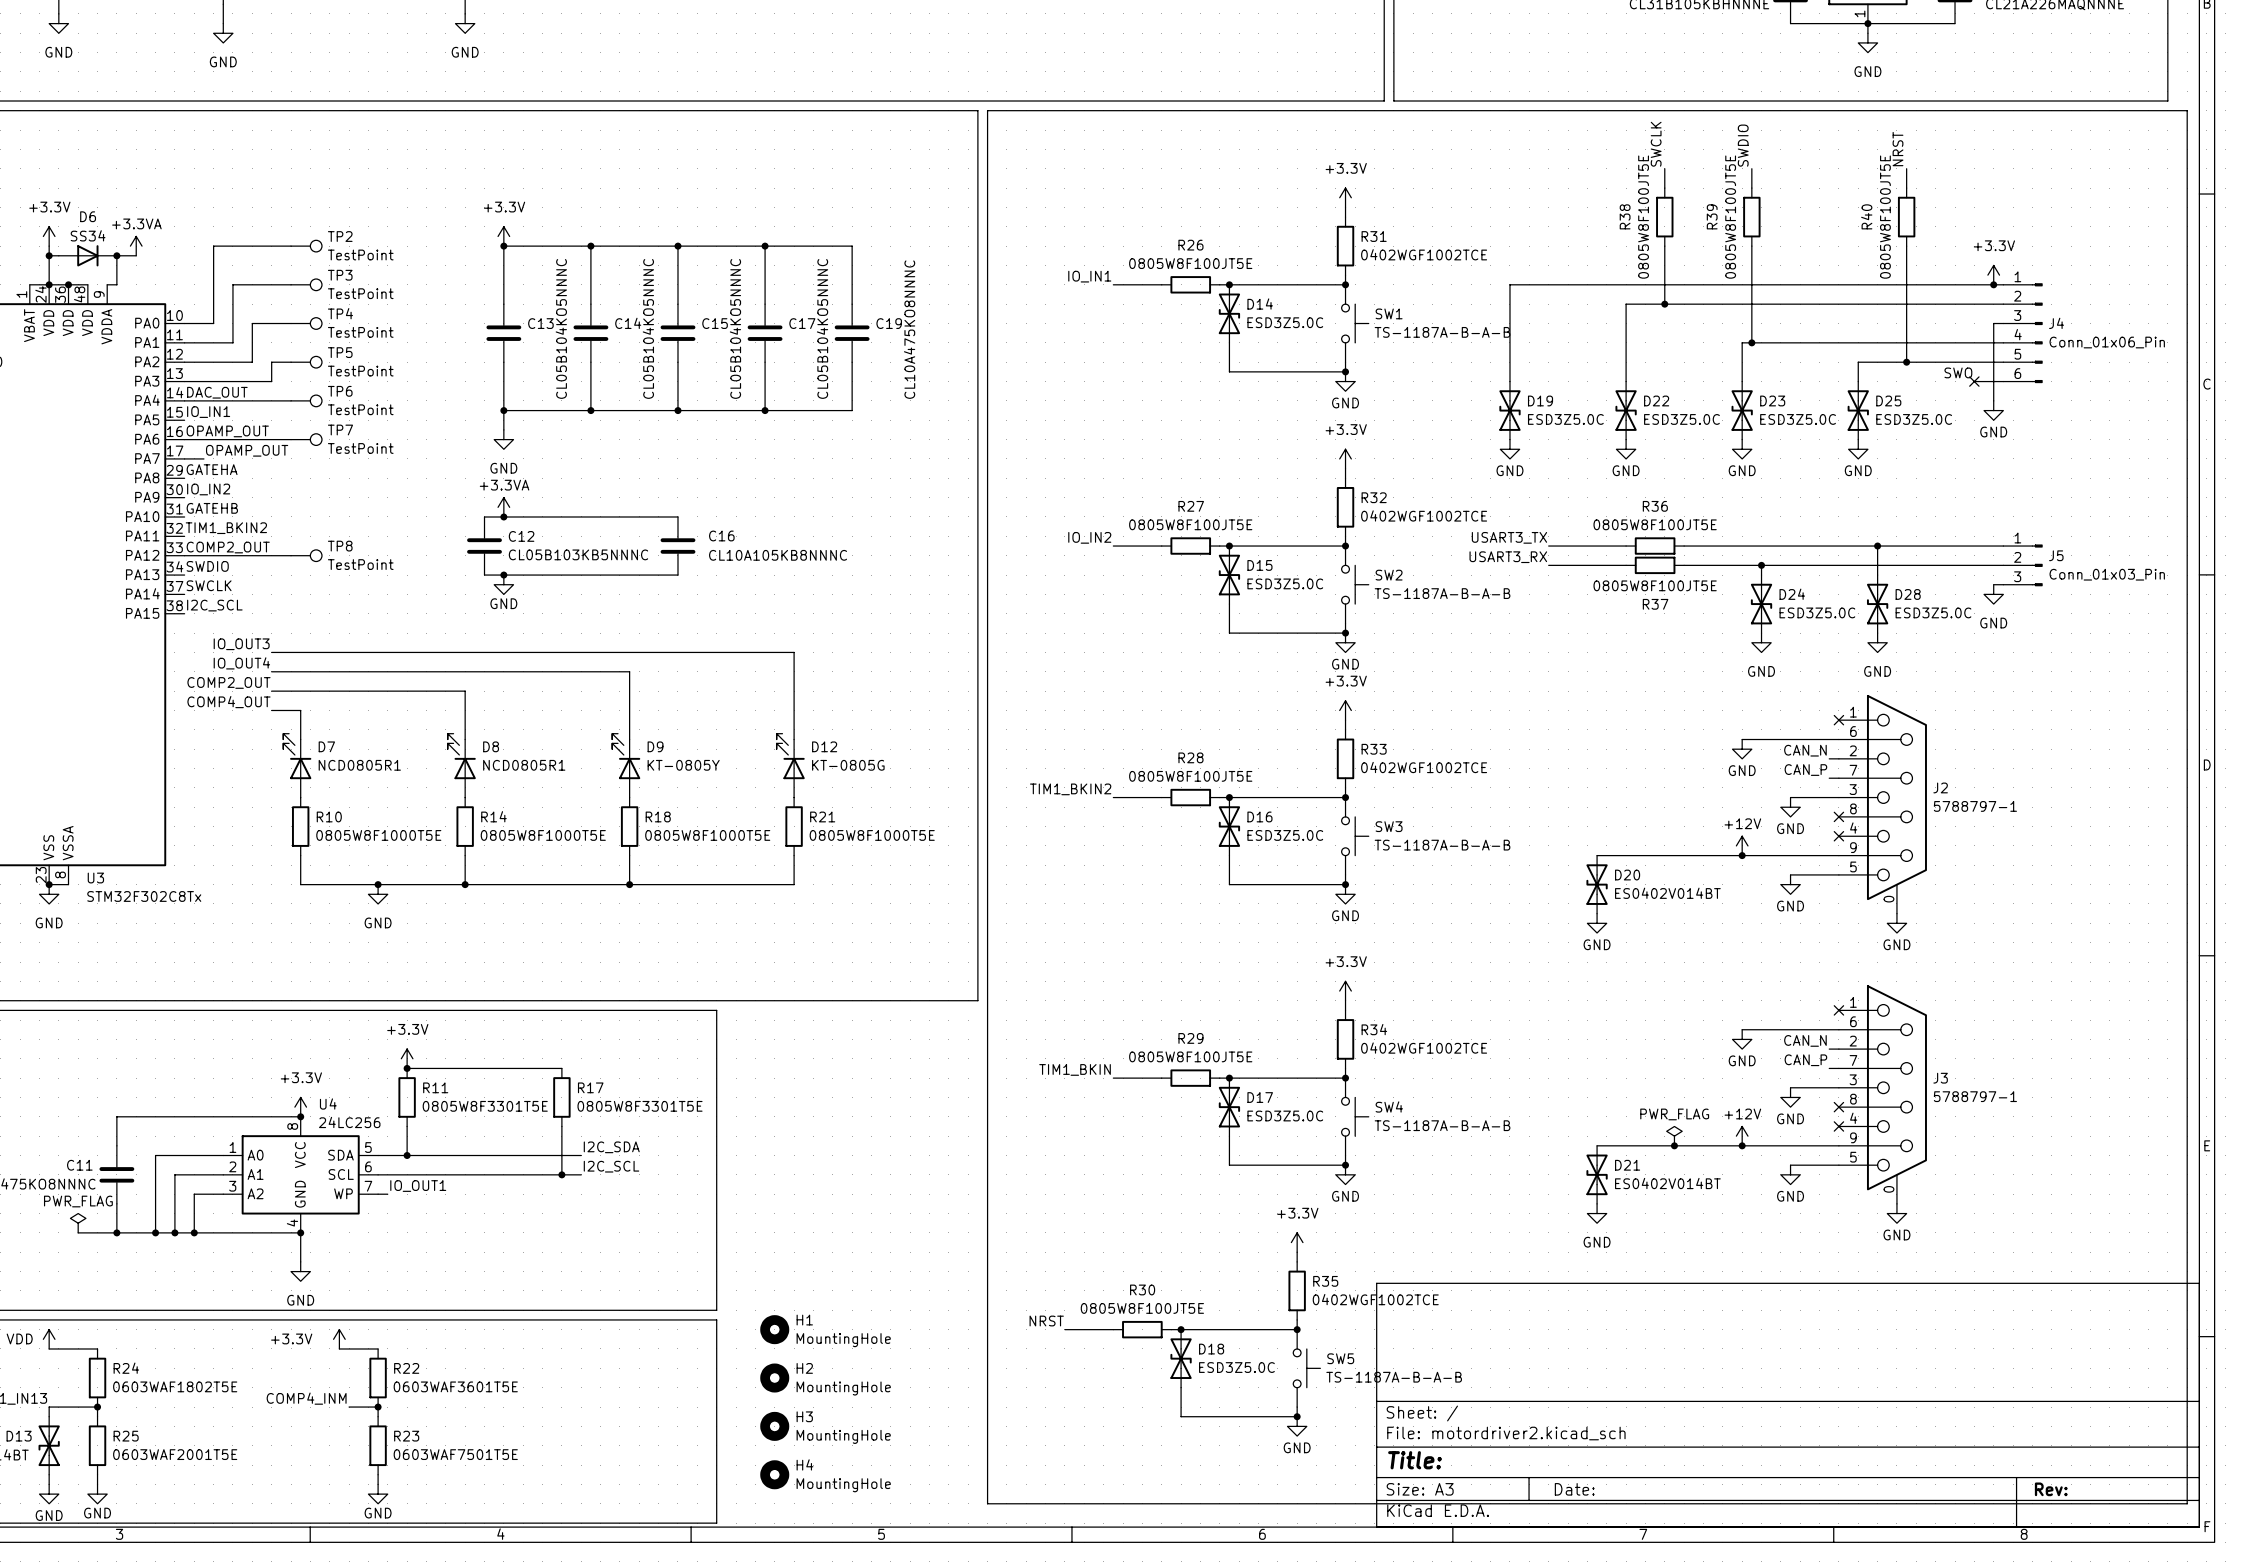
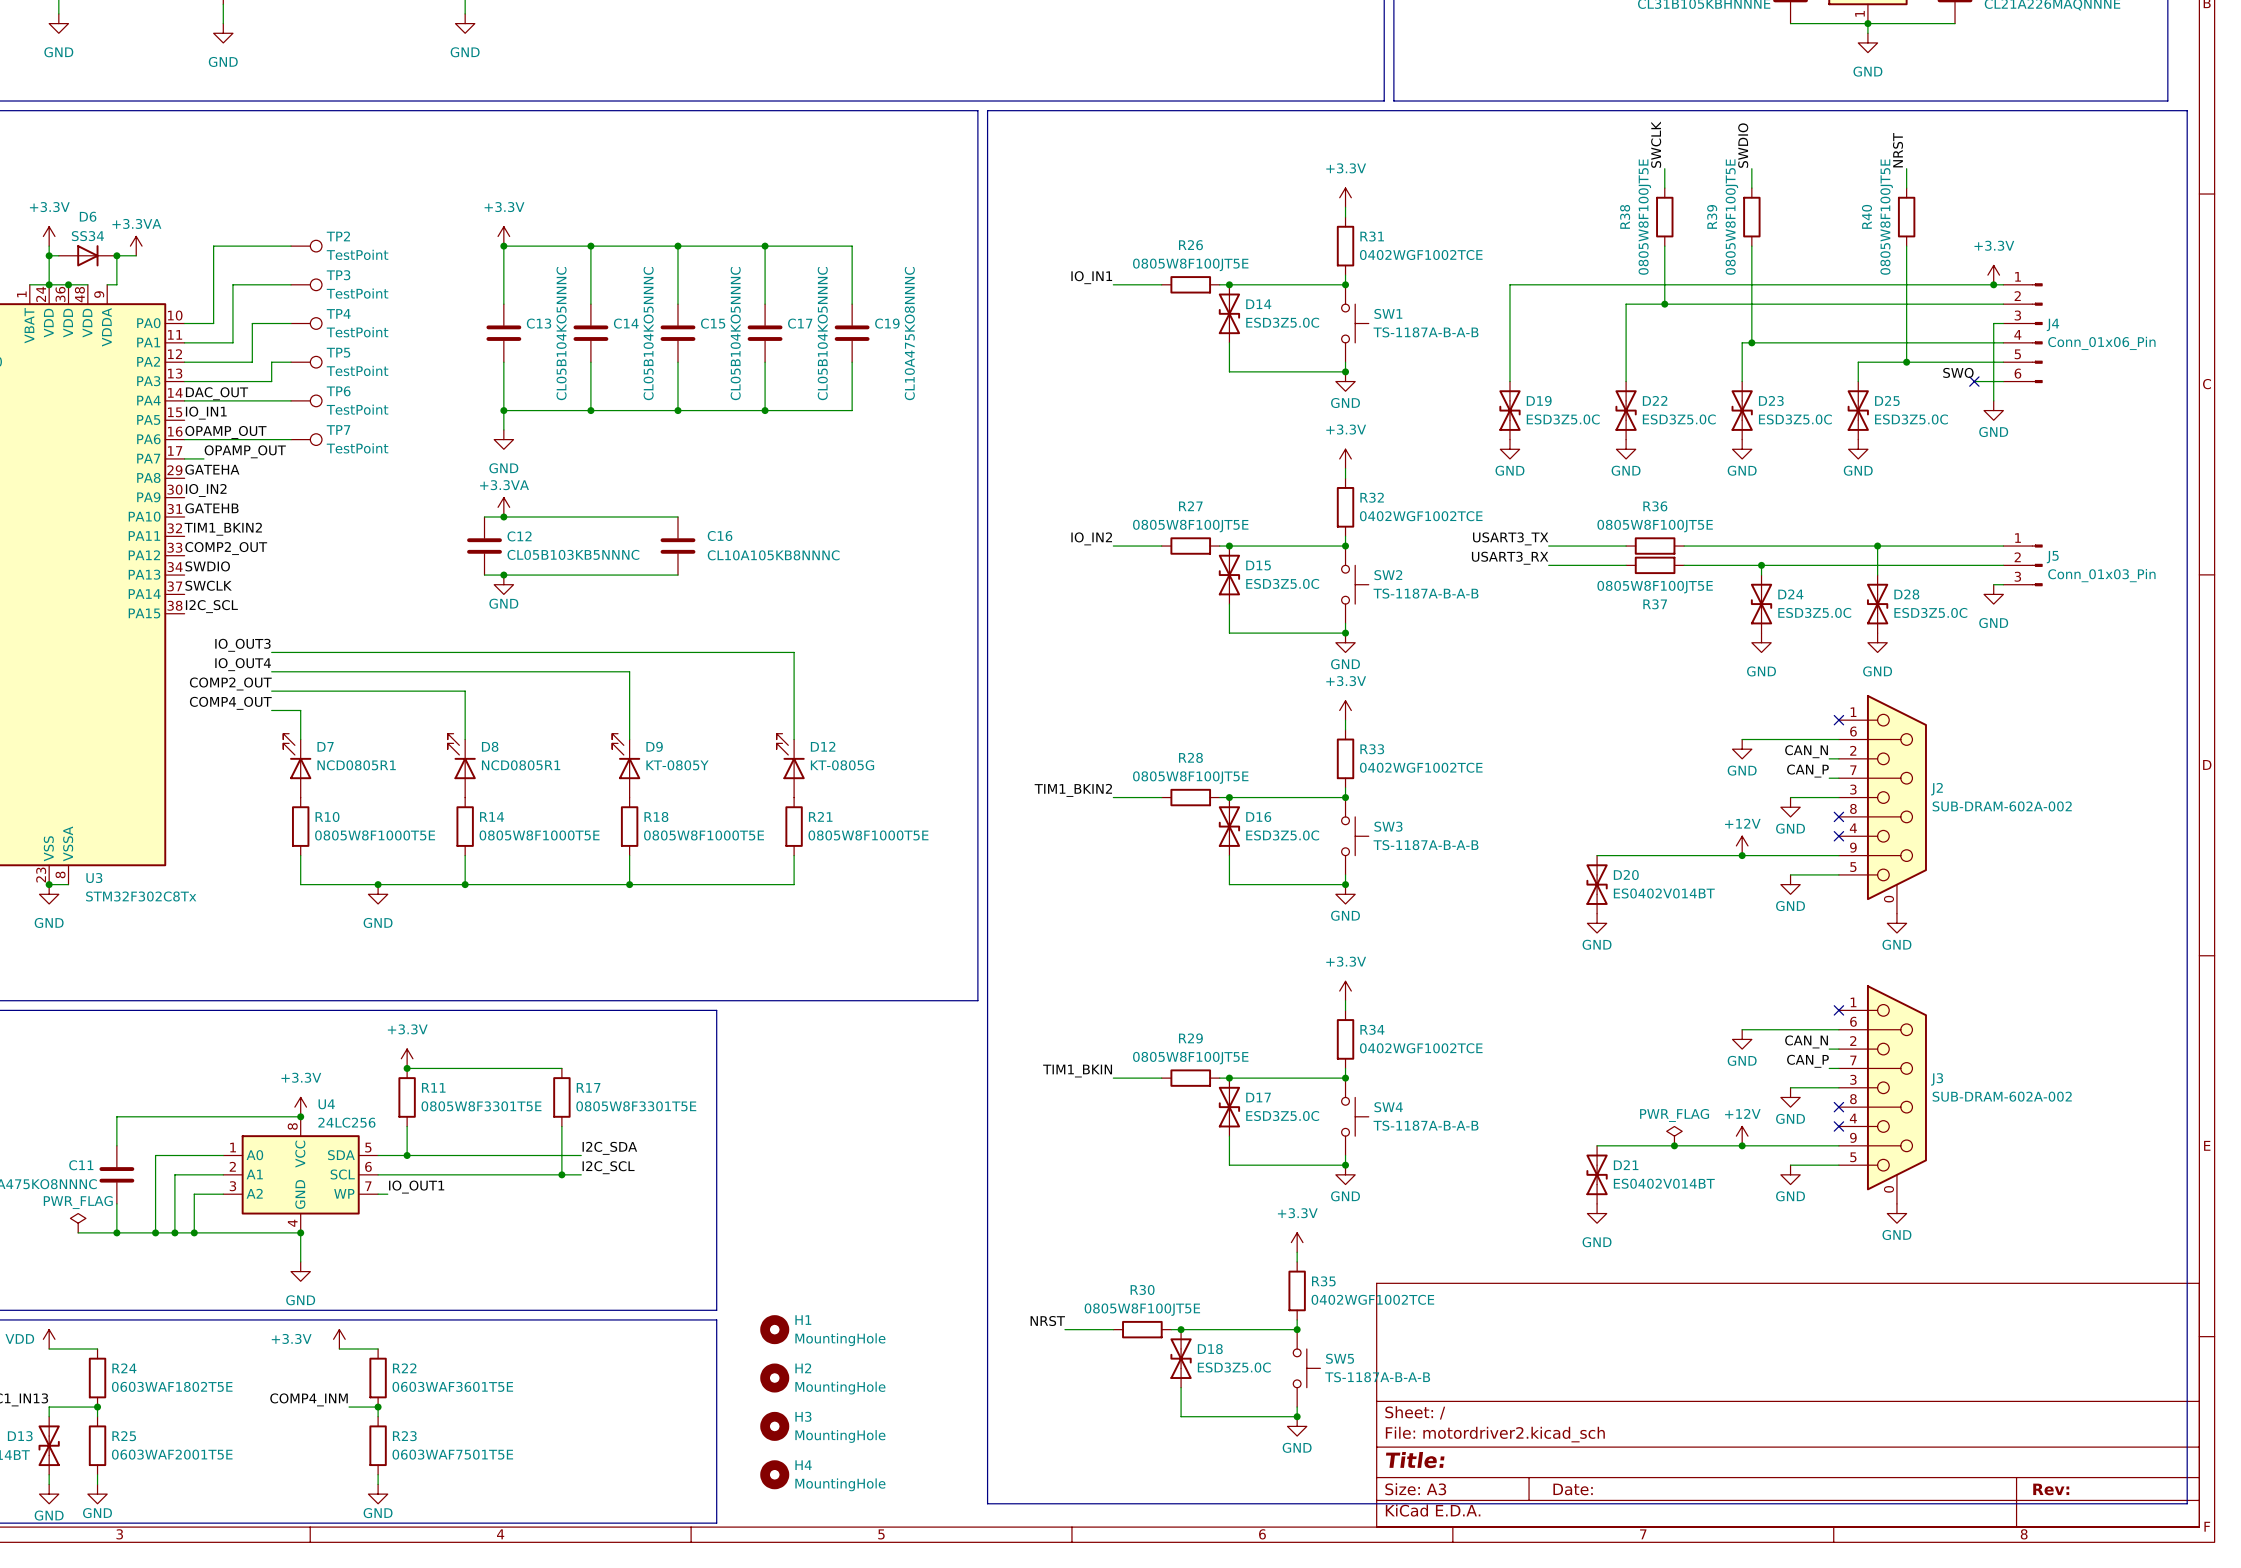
wire: (184, 555) (291, 555) -> none
TP8: TestPoint (306, 555) -> none
J2 value: 5788797-1 (1975, 806) -> SUB-DRAM-602A-002 (2002, 806)
J3 value: 5788797-1 (1975, 1096) -> SUB-DRAM-602A-002 (2002, 1096)

